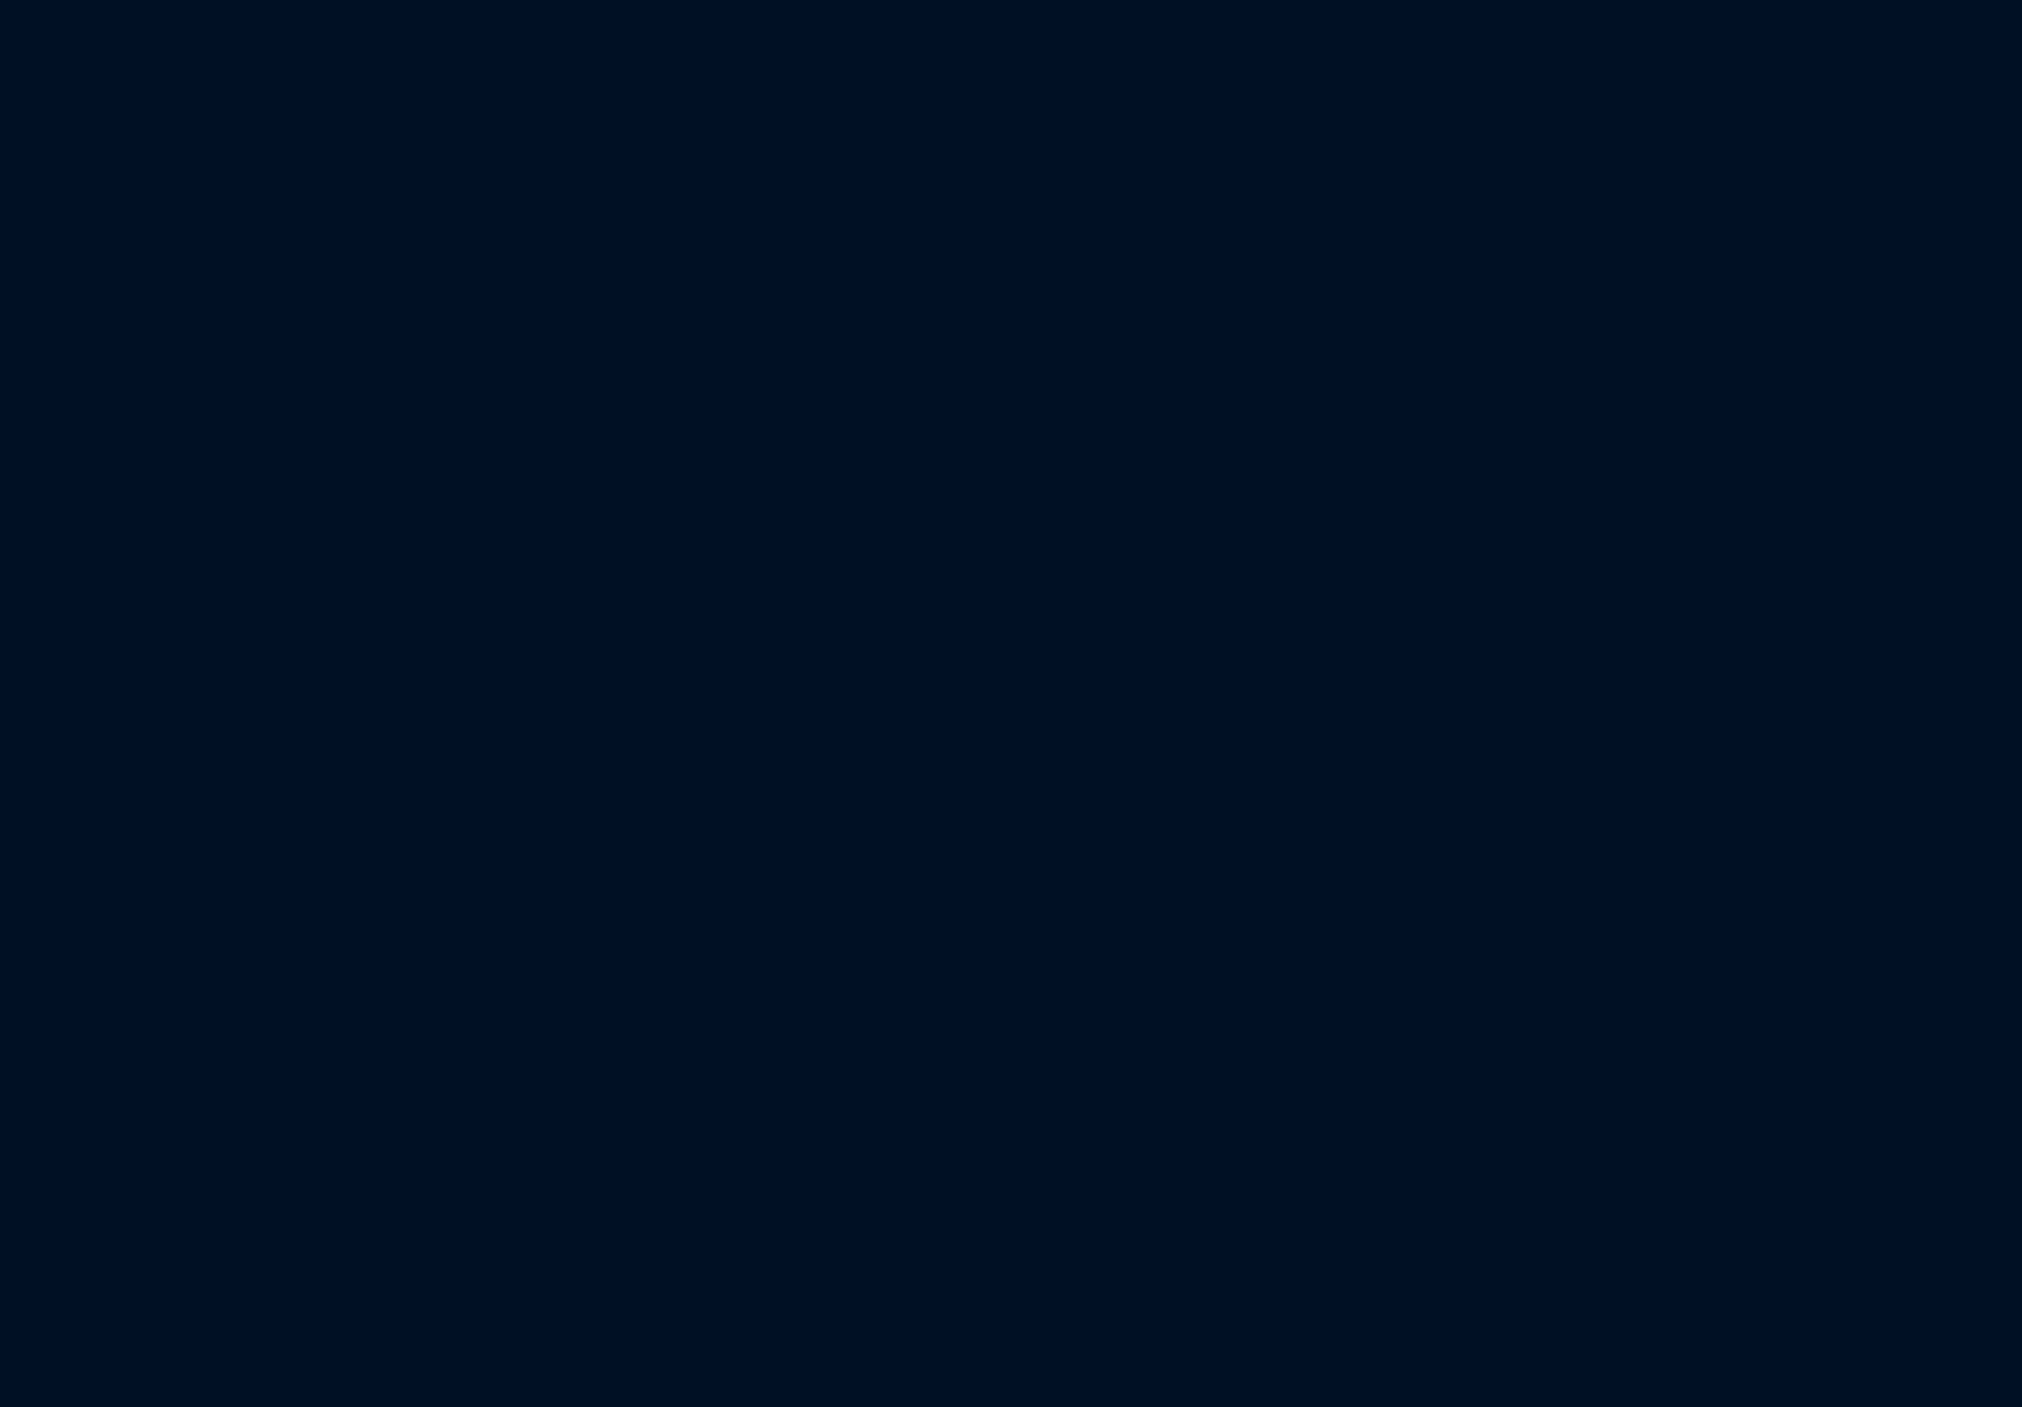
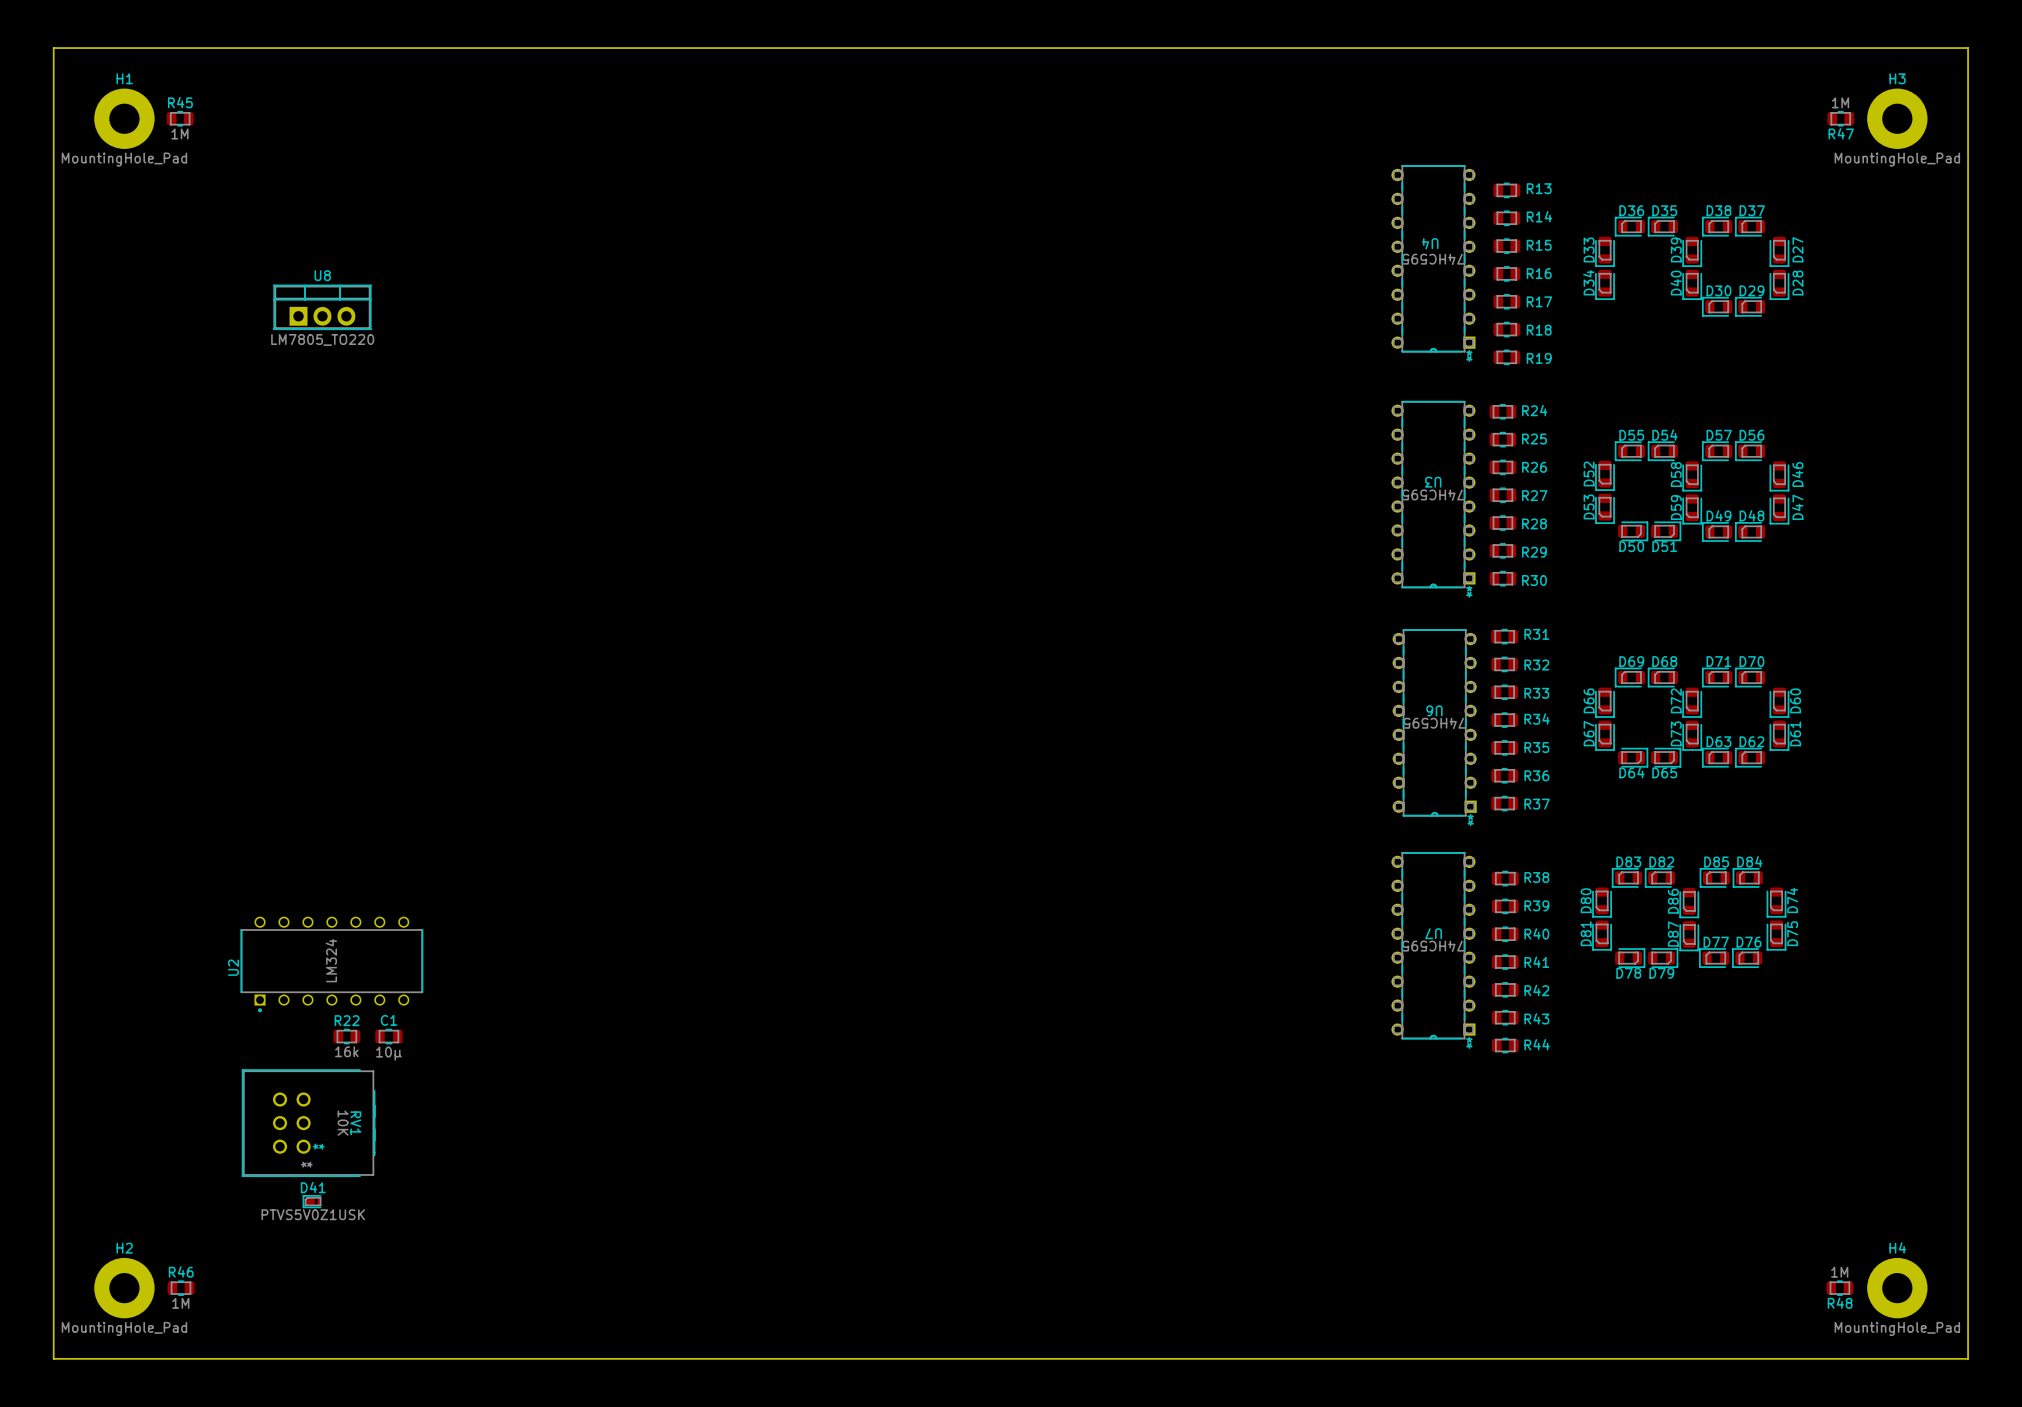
board edge: none -> (53, 48) (1968, 48) (1968, 1358) (53, 1358) (53, 48)
H1: none -> MountingHole_Pad (124, 118)
R45: none -> 1M (180, 118)
R47: none -> 1M (1840, 118)
H3: none -> MountingHole_Pad (1897, 118)
R13: none -> (1506, 190)
R14: none -> (1506, 218)
D36: none -> (1630, 226)
D35: none -> (1663, 226)
D38: none -> (1717, 226)
D37: none -> (1750, 226)
R15: none -> (1506, 246)
D33: none -> (1604, 251)
D39: none -> (1692, 251)
D27: none -> (1779, 251)
U4: none -> 74HC595 (1433, 258)
R16: none -> (1506, 273)
D34: none -> (1604, 284)
D40: none -> (1692, 284)
D28: none -> (1779, 284)
R17: none -> (1506, 301)
D30: none -> (1717, 306)
D29: none -> (1750, 306)
U8: none -> LM7805_TO220 (322, 307)
R18: none -> (1506, 329)
R19: none -> (1506, 357)
R24: none -> (1502, 411)
R25: none -> (1502, 439)
D55: none -> (1630, 451)
D54: none -> (1663, 451)
D57: none -> (1717, 451)
D56: none -> (1750, 451)
R26: none -> (1502, 467)
D52: none -> (1604, 475)
D58: none -> (1692, 476)
D46: none -> (1779, 476)
U3: none -> 74HC595 (1433, 494)
R27: none -> (1502, 495)
D53: none -> (1604, 508)
D59: none -> (1692, 509)
D47: none -> (1779, 509)
R28: none -> (1502, 523)
D50: none -> (1633, 531)
D51: none -> (1666, 531)
D49: none -> (1717, 531)
D48: none -> (1750, 531)
R29: none -> (1502, 550)
R30: none -> (1502, 578)
R31: none -> (1504, 636)
R32: none -> (1504, 664)
D69: none -> (1630, 677)
D68: none -> (1663, 677)
D71: none -> (1717, 677)
D70: none -> (1750, 677)
R33: none -> (1504, 692)
D66: none -> (1604, 702)
D72: none -> (1692, 702)
D60: none -> (1779, 702)
R34: none -> (1504, 720)
U6: none -> 74HC595 (1434, 722)
D67: none -> (1604, 735)
D73: none -> (1692, 735)
D61: none -> (1779, 735)
R35: none -> (1504, 747)
D64: none -> (1633, 757)
D65: none -> (1666, 757)
D63: none -> (1717, 757)
D62: none -> (1750, 757)
R36: none -> (1504, 775)
R37: none -> (1504, 803)
D83: none -> (1627, 877)
D82: none -> (1660, 877)
D85: none -> (1714, 877)
D84: none -> (1747, 877)
R38: none -> (1505, 878)
D80: none -> (1602, 902)
D74: none -> (1776, 902)
D86: none -> (1689, 903)
R39: none -> (1505, 906)
R40: none -> (1505, 934)
D81: none -> (1602, 935)
D75: none -> (1776, 935)
D87: none -> (1689, 936)
U7: none -> 74HC595 (1433, 945)
D78: none -> (1630, 958)
D79: none -> (1663, 958)
D77: none -> (1714, 958)
D76: none -> (1747, 958)
R41: none -> (1505, 962)
U2: none -> LM324 (331, 964)
R42: none -> (1505, 989)
R43: none -> (1505, 1017)
R22: none -> 16k (346, 1036)
C1: none -> 10µ (388, 1036)
R44: none -> (1505, 1045)
RV1: none -> 10K (308, 1123)
D41: none -> PTVS5V0Z1USK (312, 1201)
H2: none -> MountingHole_Pad (124, 1288)
R46: none -> 1M (181, 1288)
R48: none -> 1M (1839, 1288)
H4: none -> MountingHole_Pad (1897, 1288)

